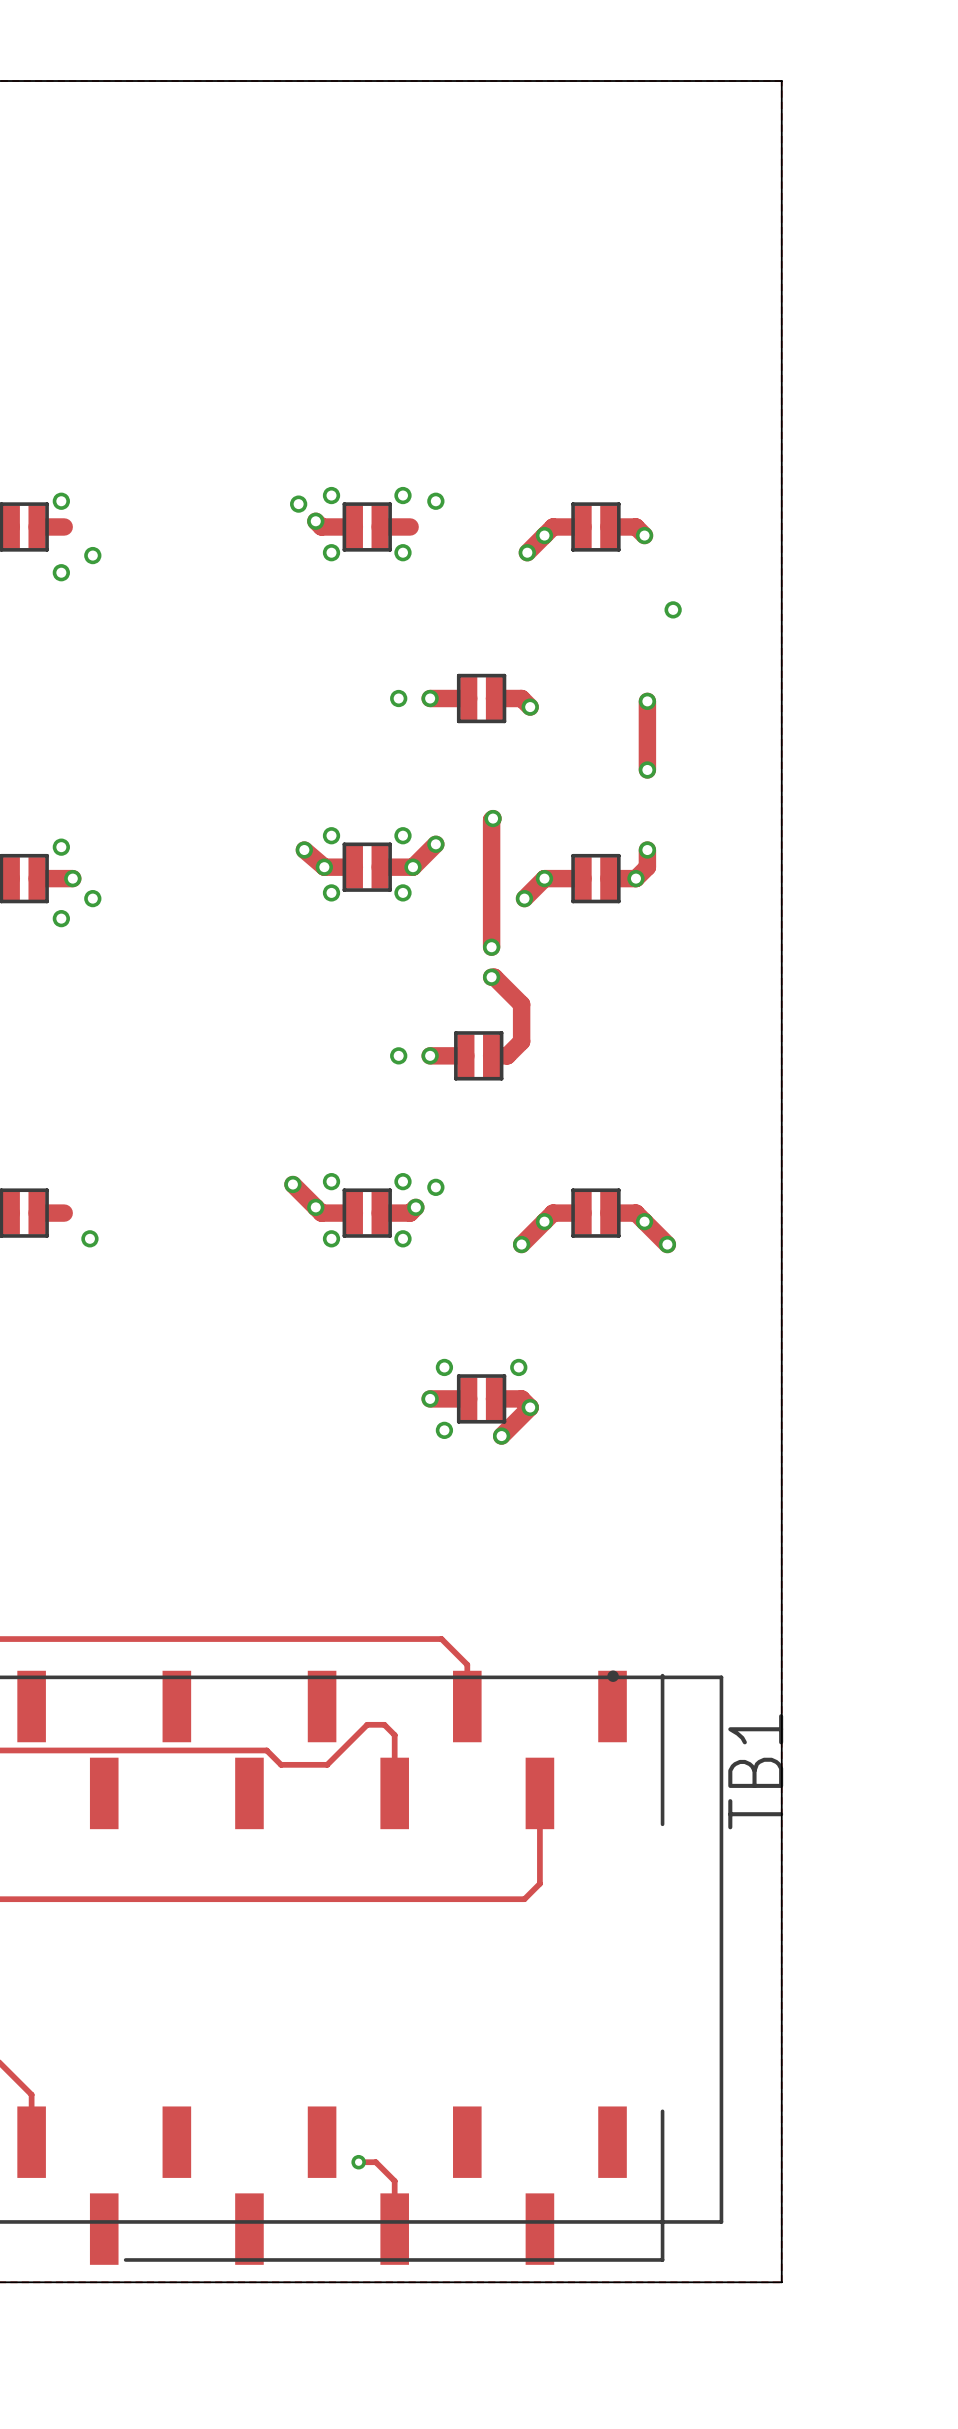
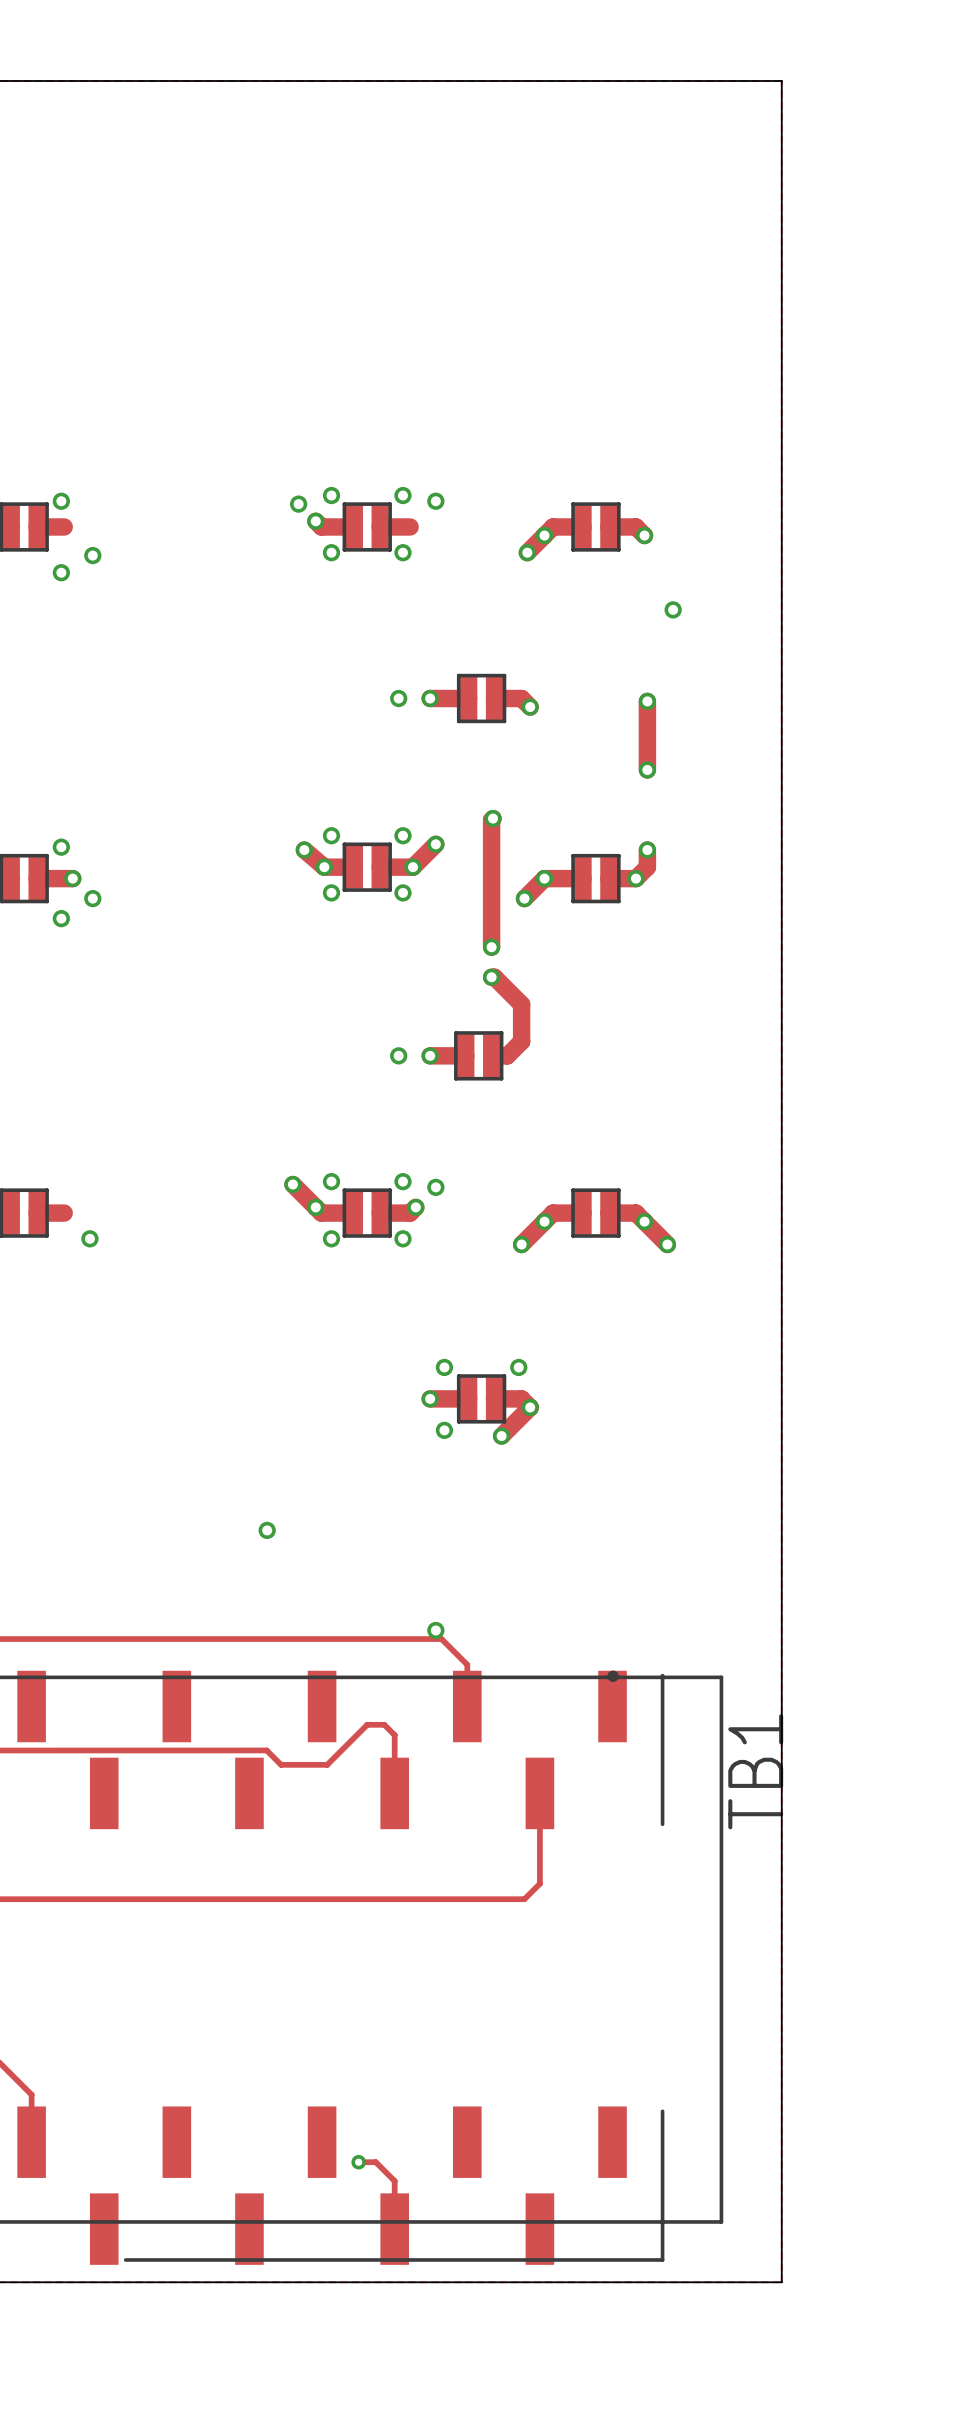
via: none -> (267, 1530)
via: none -> (435, 1630)

